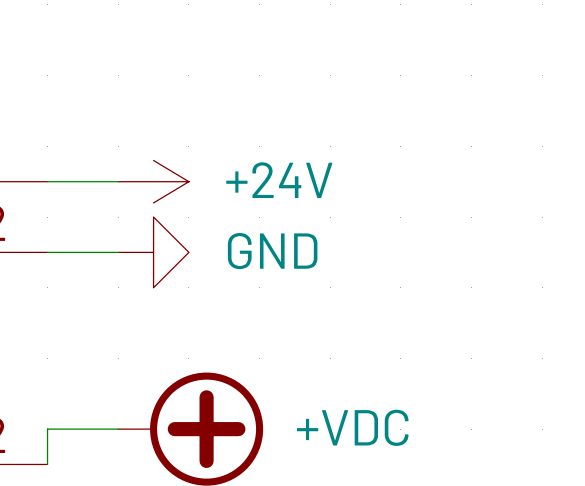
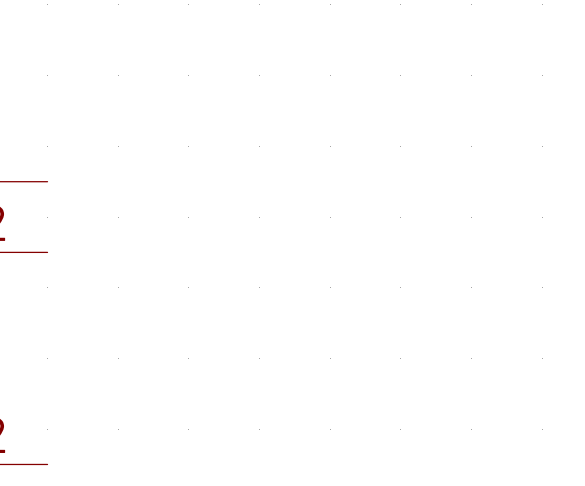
wire: (47, 181) (118, 181) -> none
power symbol: +24V (153, 181) -> none
wire: (47, 252) (118, 252) -> none
power symbol: GND (153, 252) -> none
wire: (118, 429) (47, 429) (47, 464) -> none
power symbol: +VDC (190, 429) -> none

